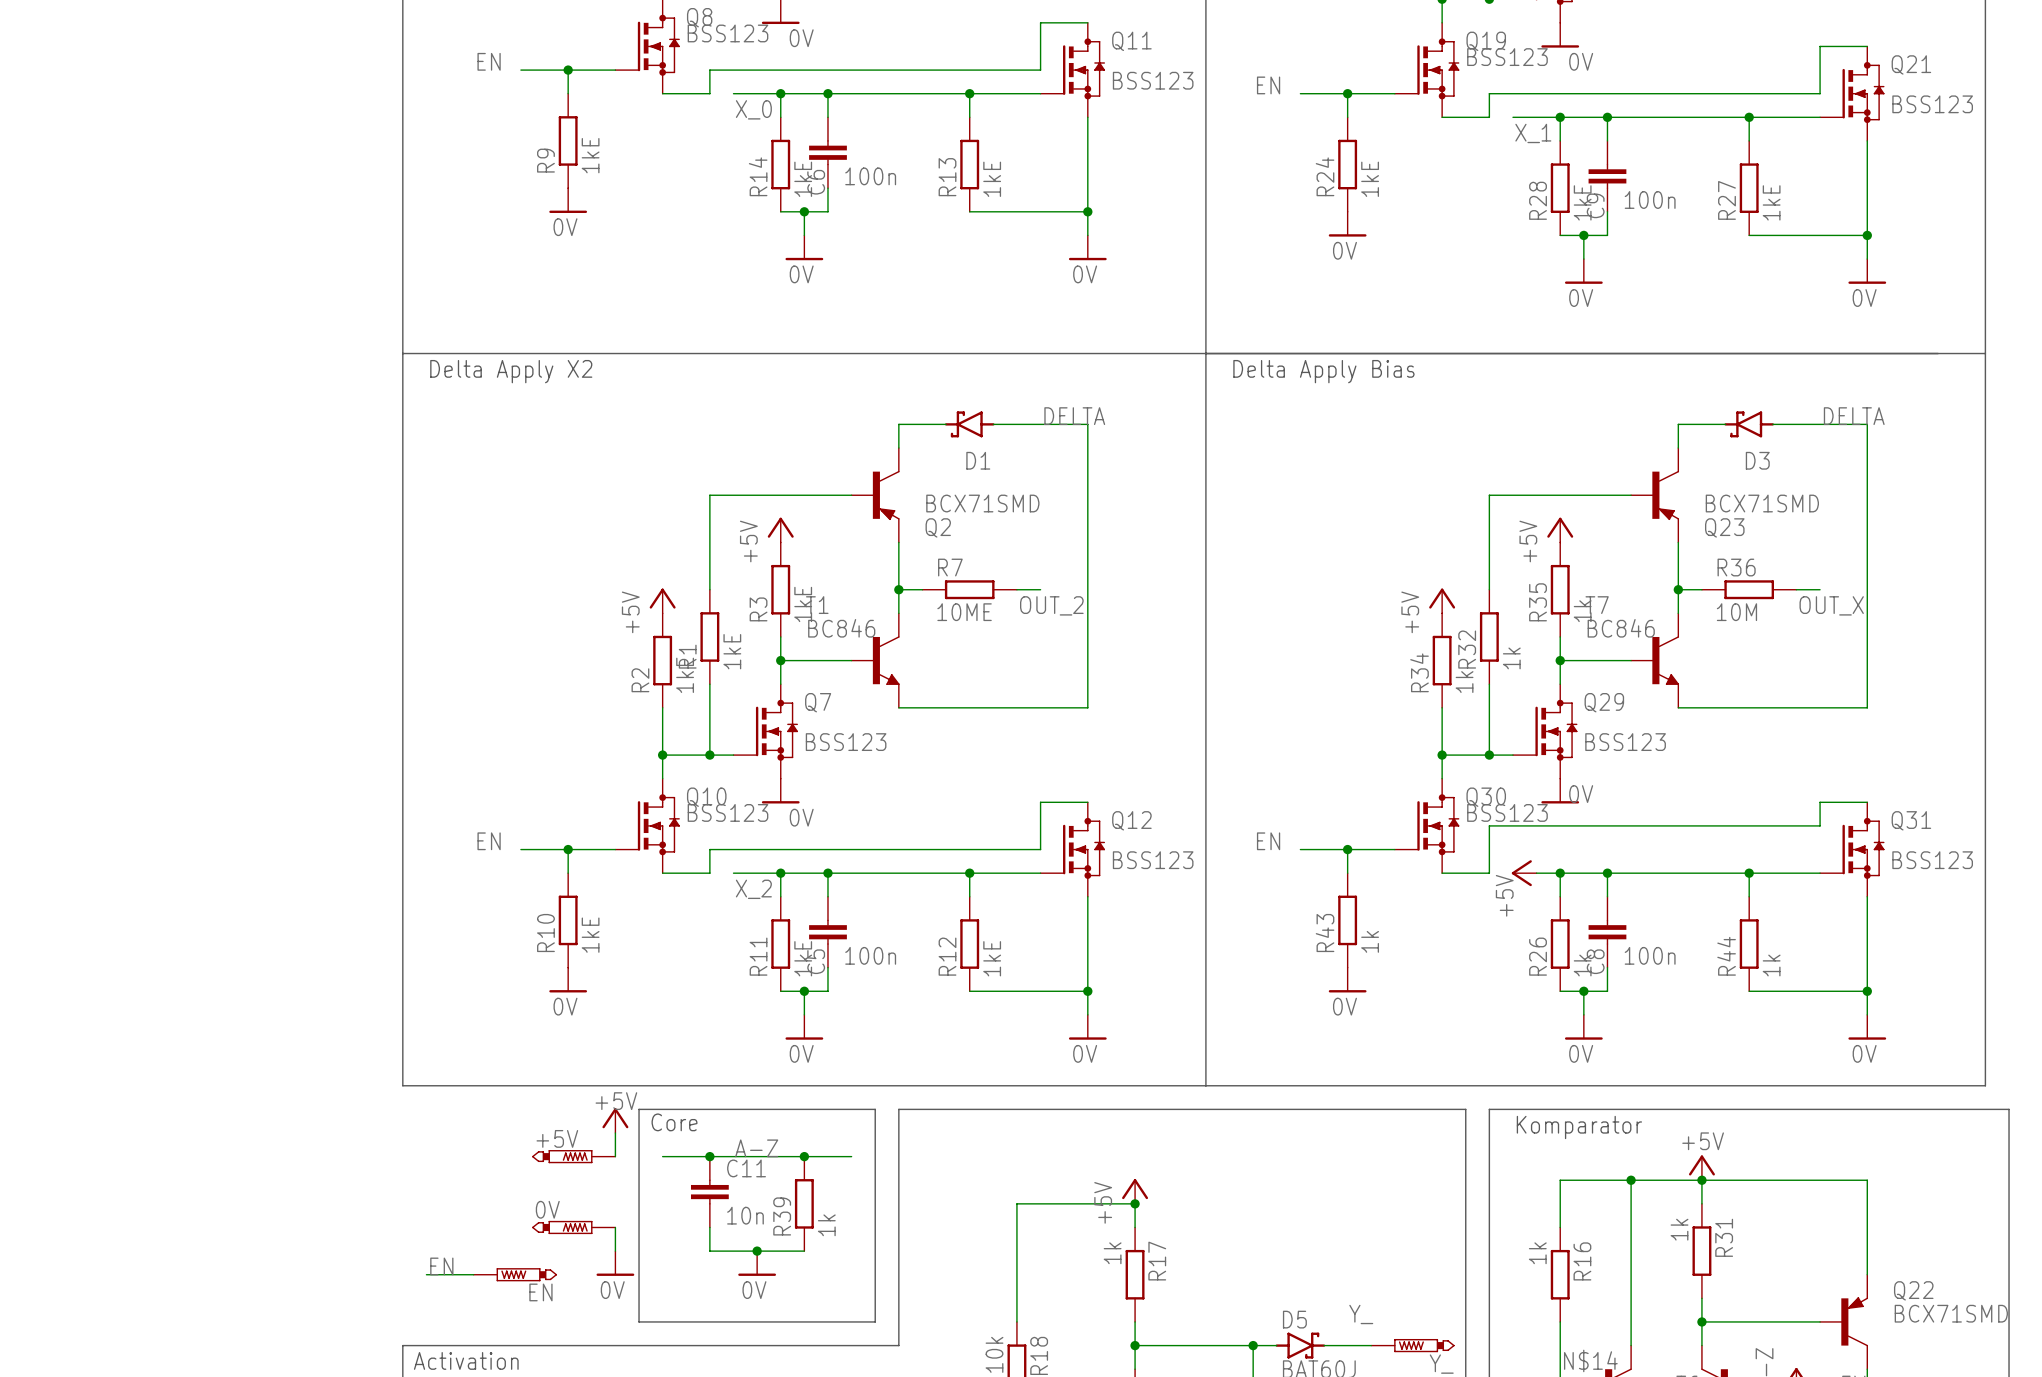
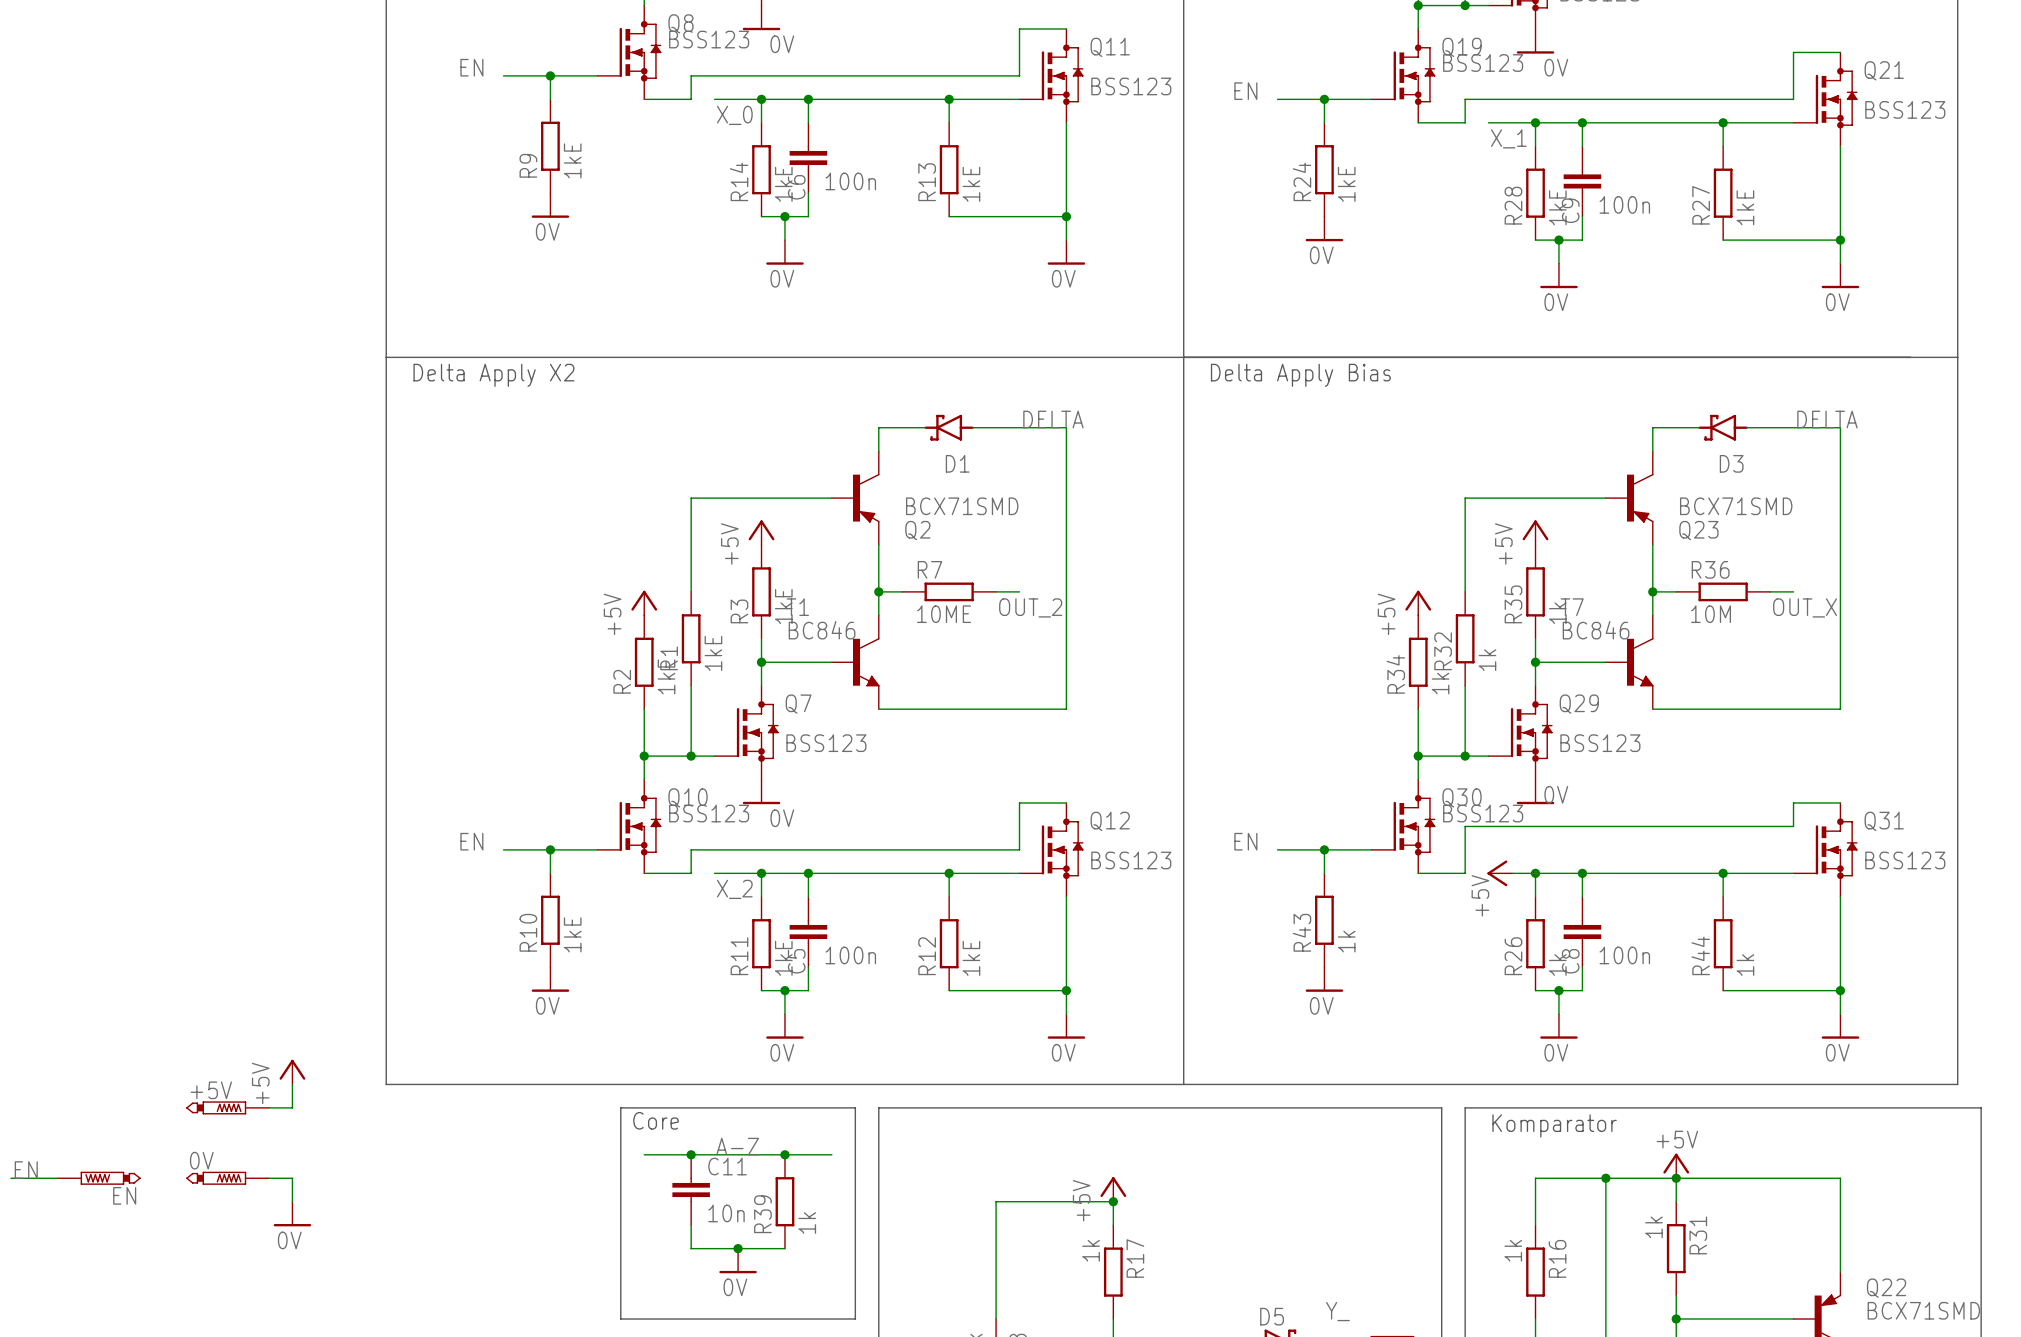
power symbol: none -> +5V (292, 1072)
wire: none -> (292, 1084) (292, 1107) (268, 1107)
power symbol: +5V (615, 1120) -> none
wire: (615, 1133) (615, 1156) -> none
+5V position: (573, 1156) -> (227, 1107)
label: none -> EN (26, 1170)
wire: none -> (10, 1178) (57, 1178)
EN: none -> (99, 1178)
wire: none -> (268, 1178) (292, 1178) (292, 1201)
power symbol: none -> 0V (292, 1214)
0V position: (573, 1227) -> (227, 1178)
wire: (615, 1227) (615, 1251) -> none
power symbol: 0V (615, 1263) -> none
label: EN (441, 1266) -> none
wire: (426, 1274) (473, 1274) -> none
EN: (515, 1274) -> none

